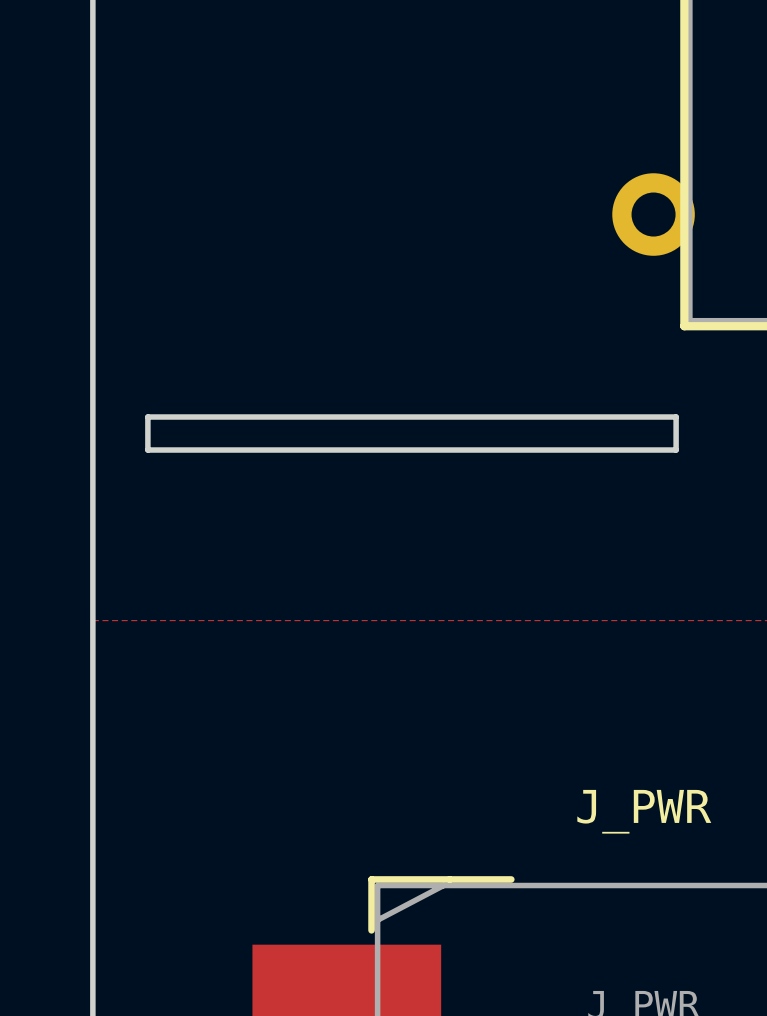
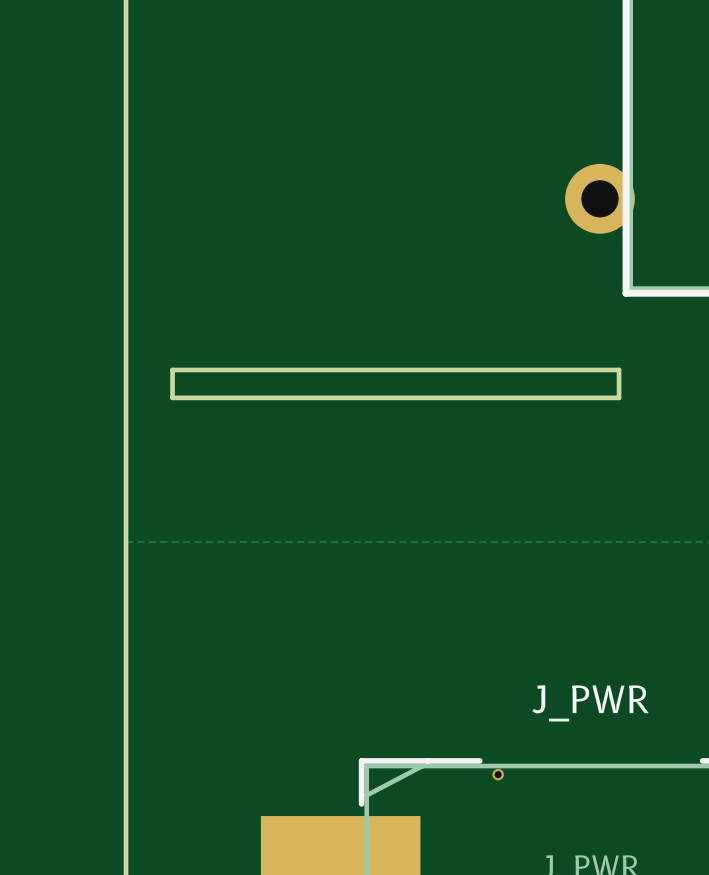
via: none -> (498, 774)

